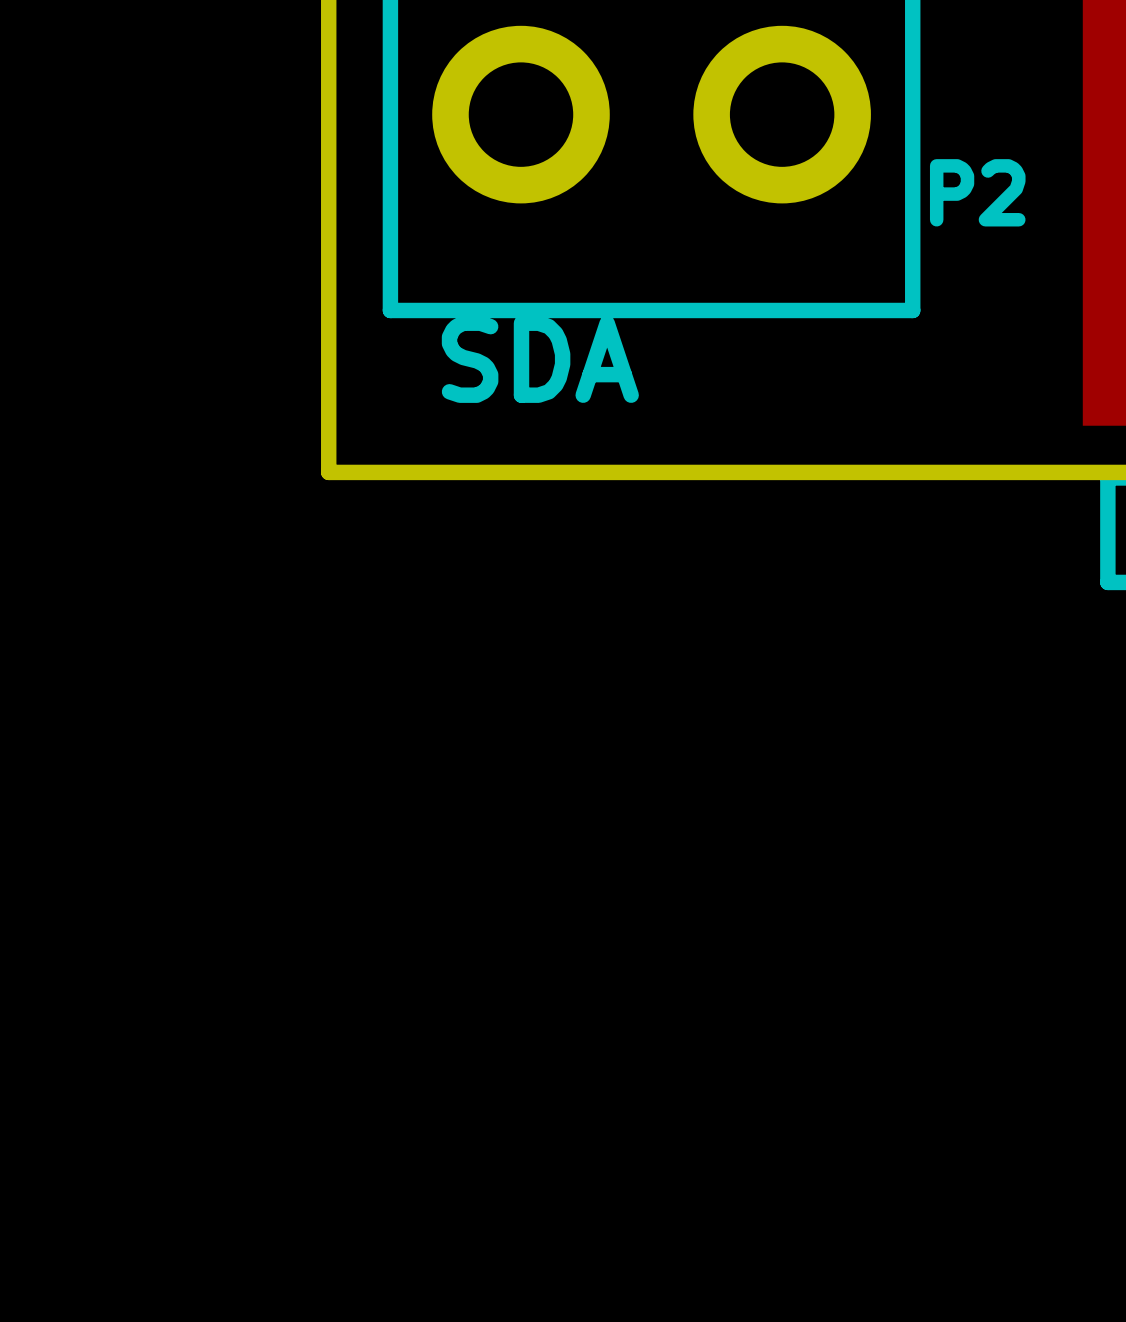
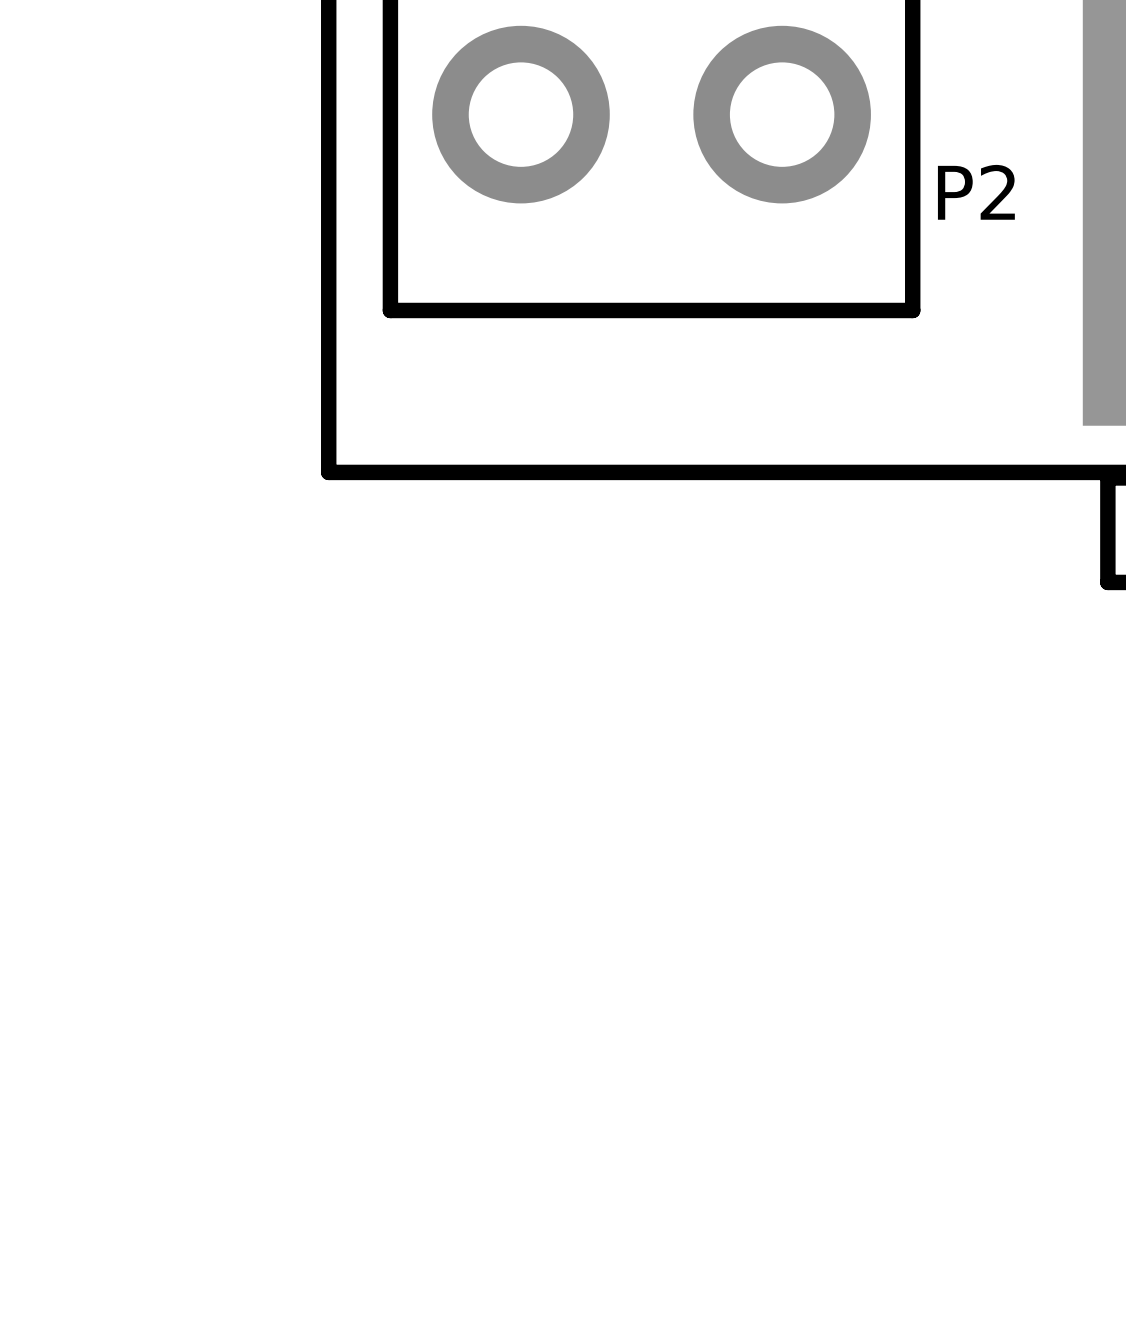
text: SDA (540, 359) -> none

